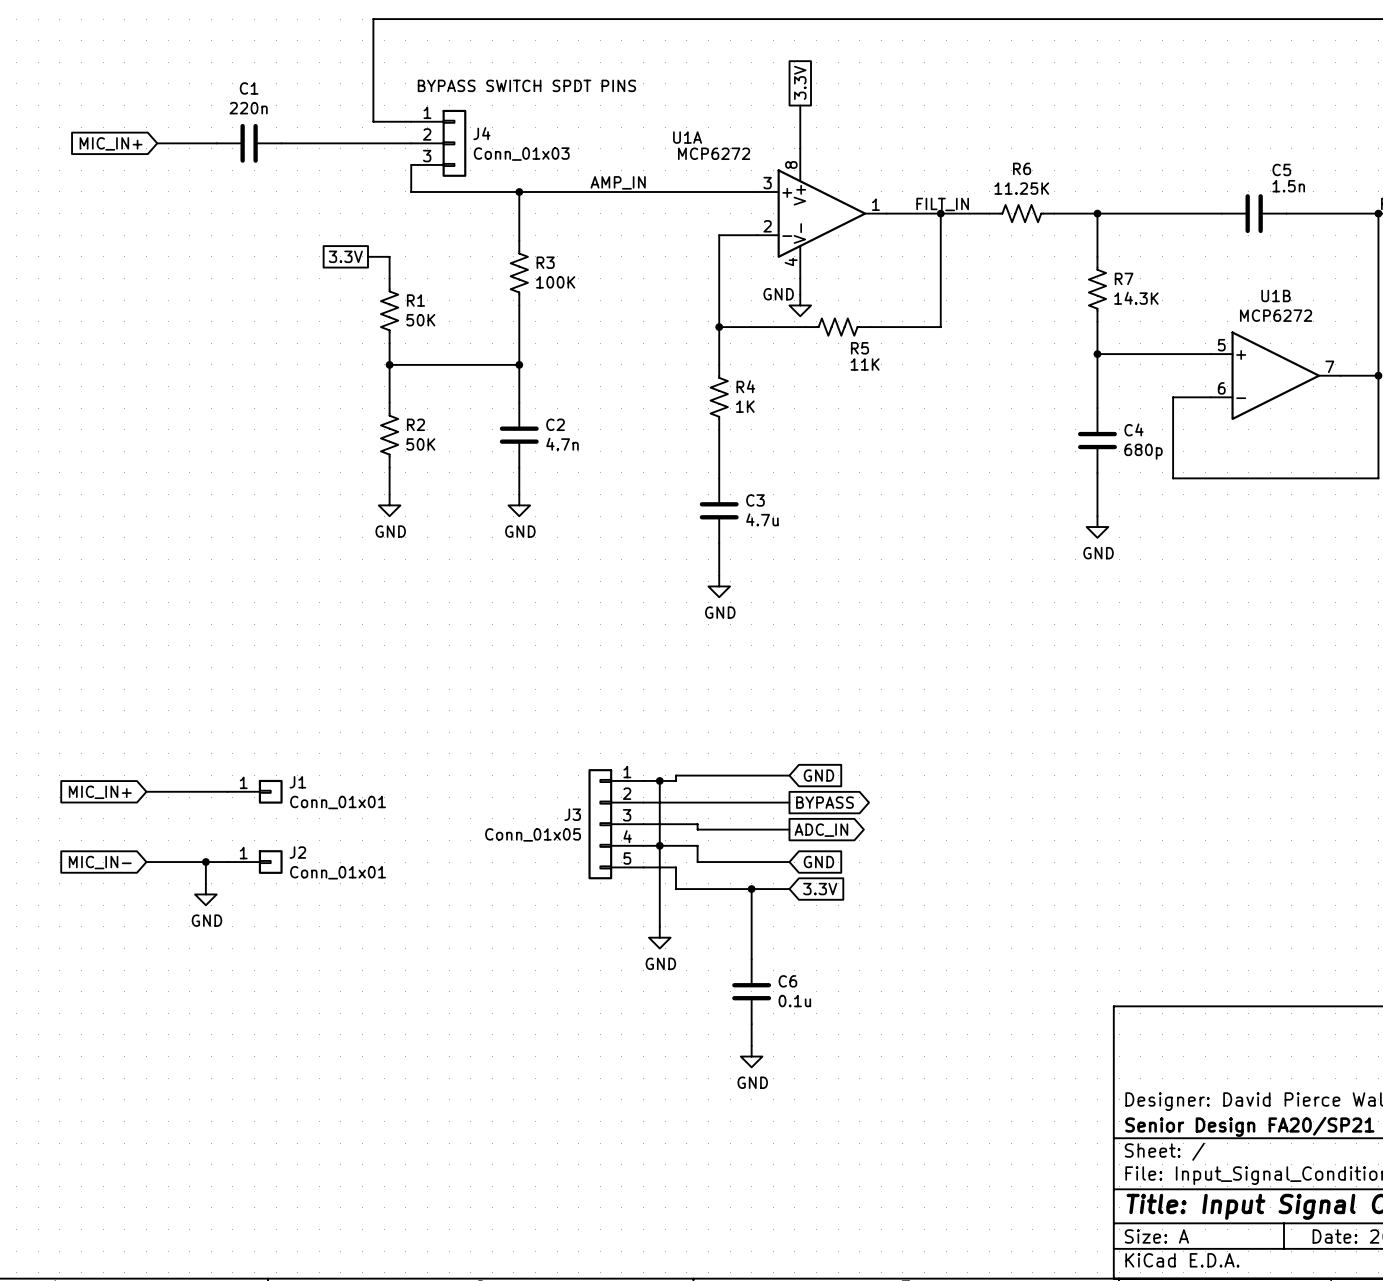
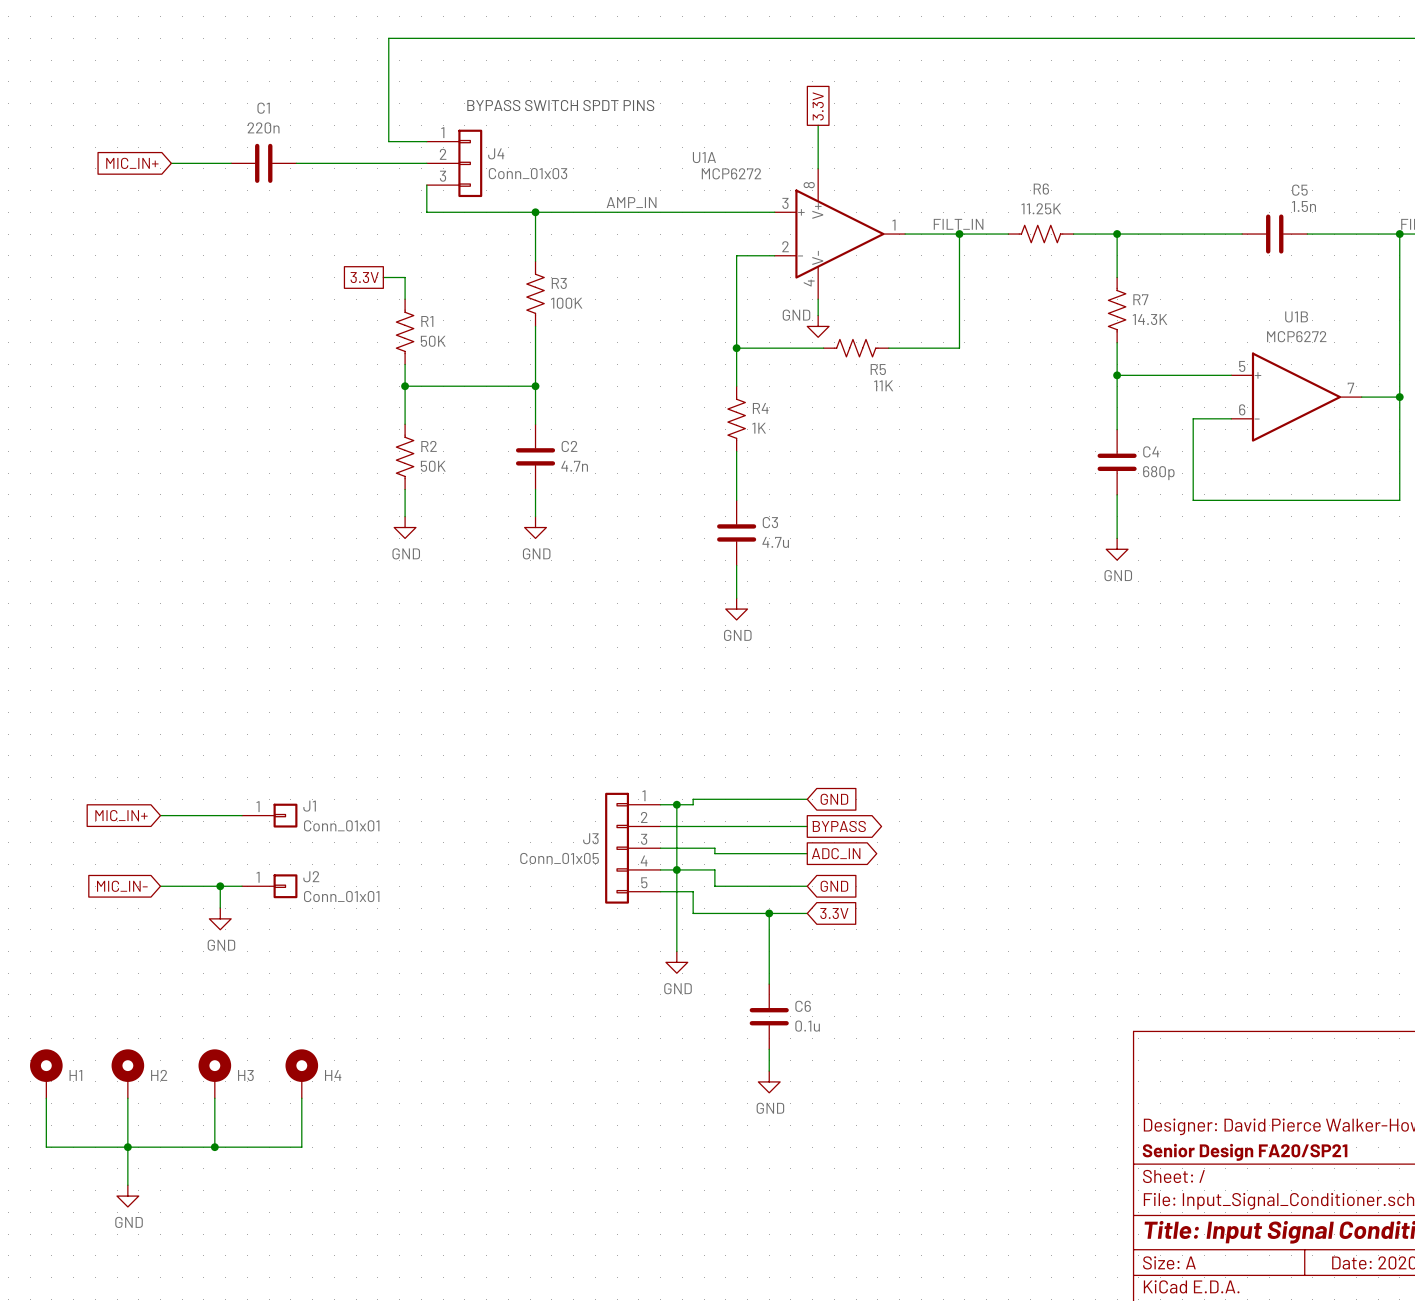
H1: none -> (46, 1073)
H2: none -> (127, 1073)
H3: none -> (214, 1073)
H4: none -> (301, 1073)
wire: none -> (46, 1098) (46, 1147) (301, 1147) (301, 1098)
wire: none -> (127, 1098) (127, 1185)
wire: none -> (214, 1098) (214, 1147)
junction: none -> (127, 1147)
junction: none -> (214, 1147)
power symbol: none -> GND (127, 1196)

